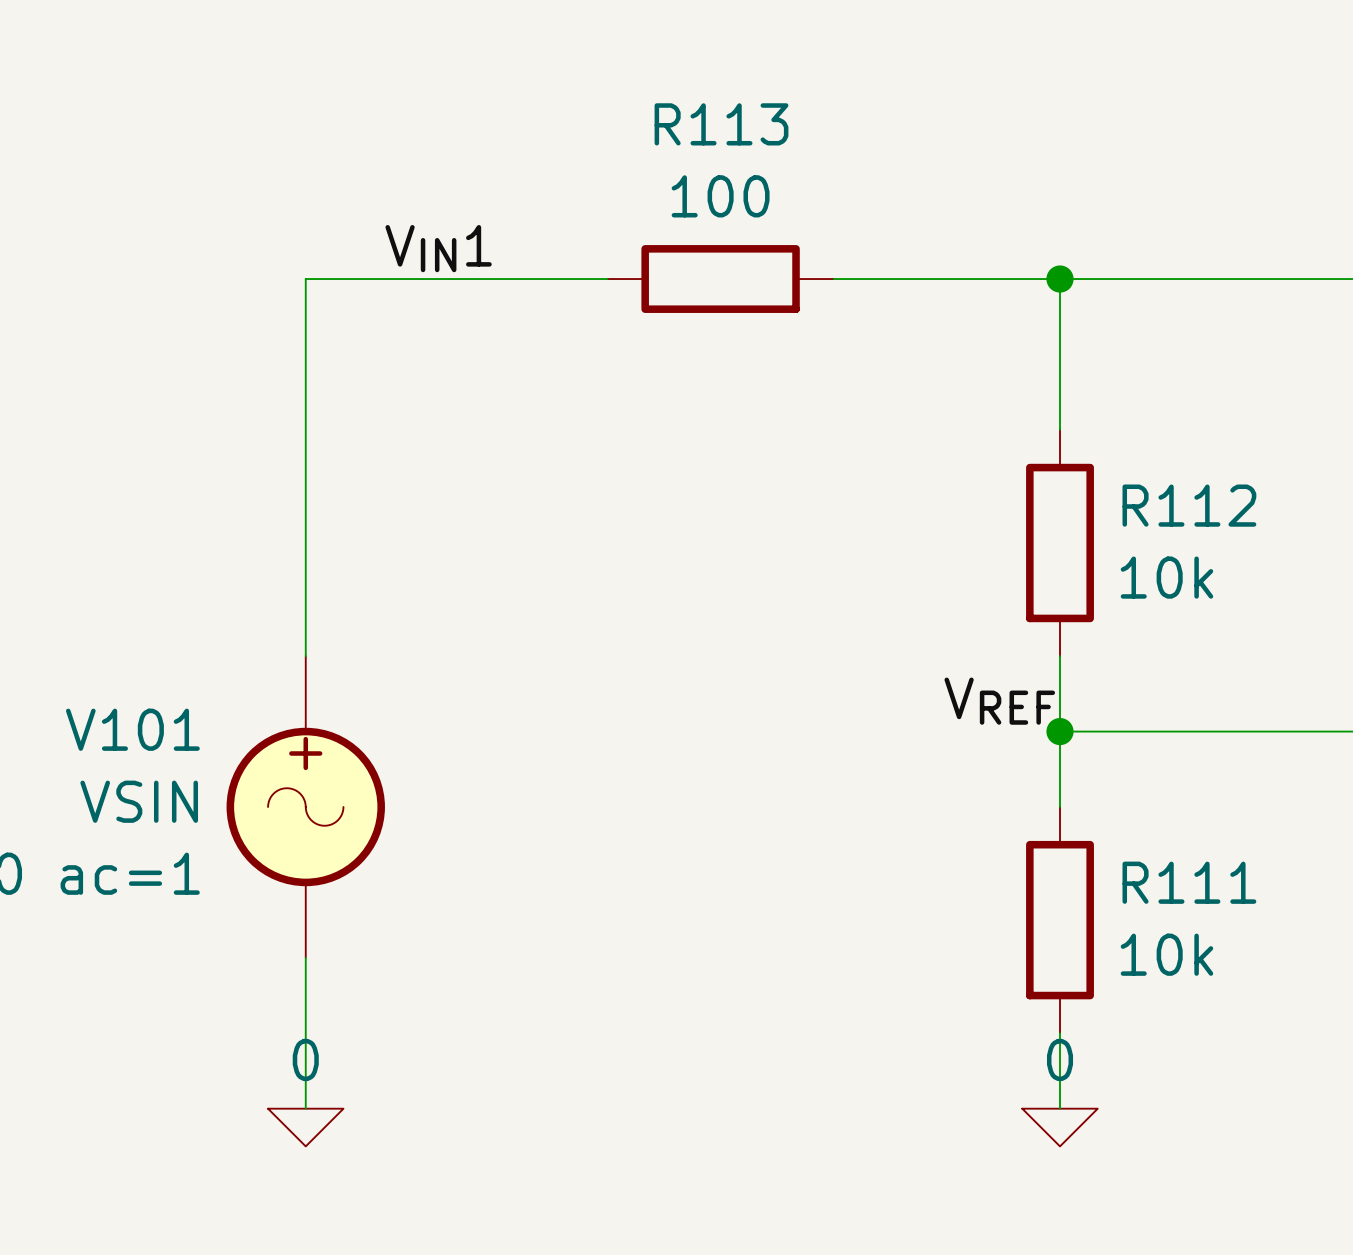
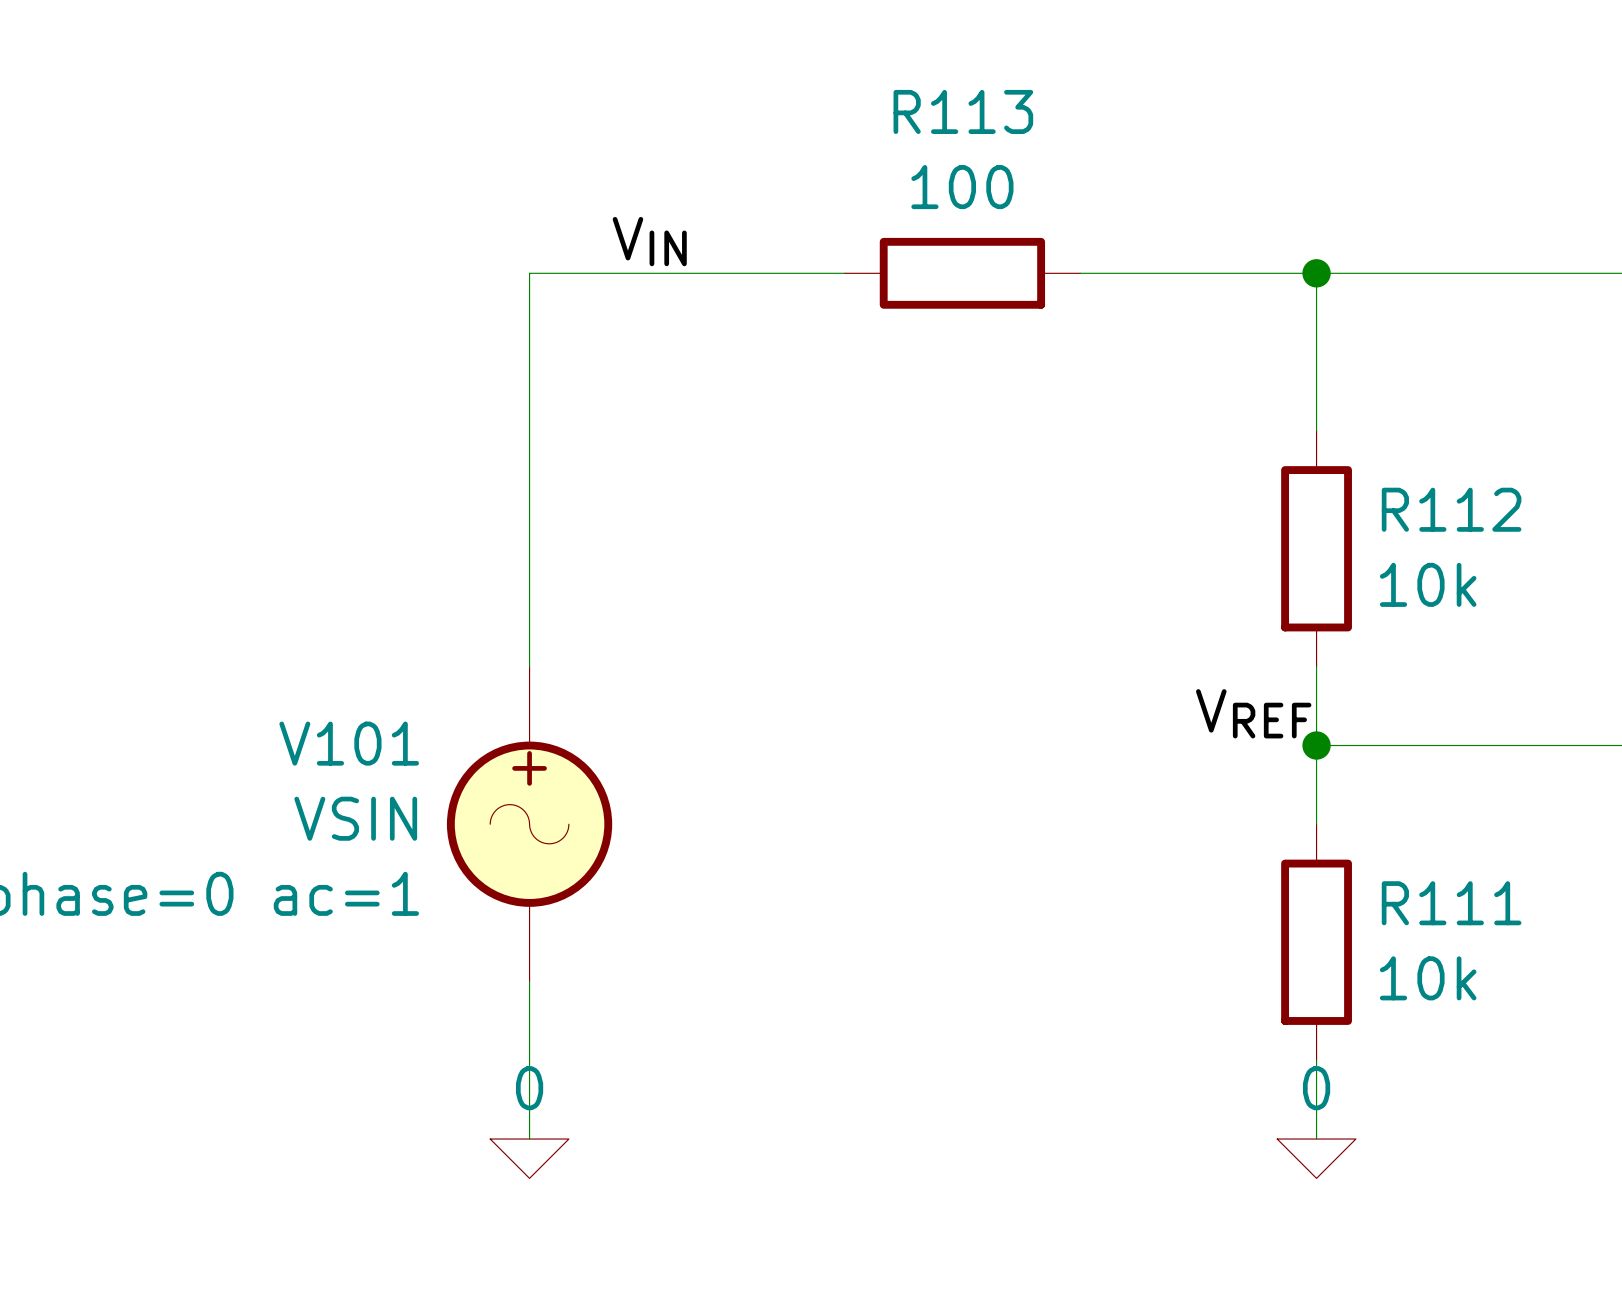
label: VIN1 (438, 248) -> VIN (649, 241)

